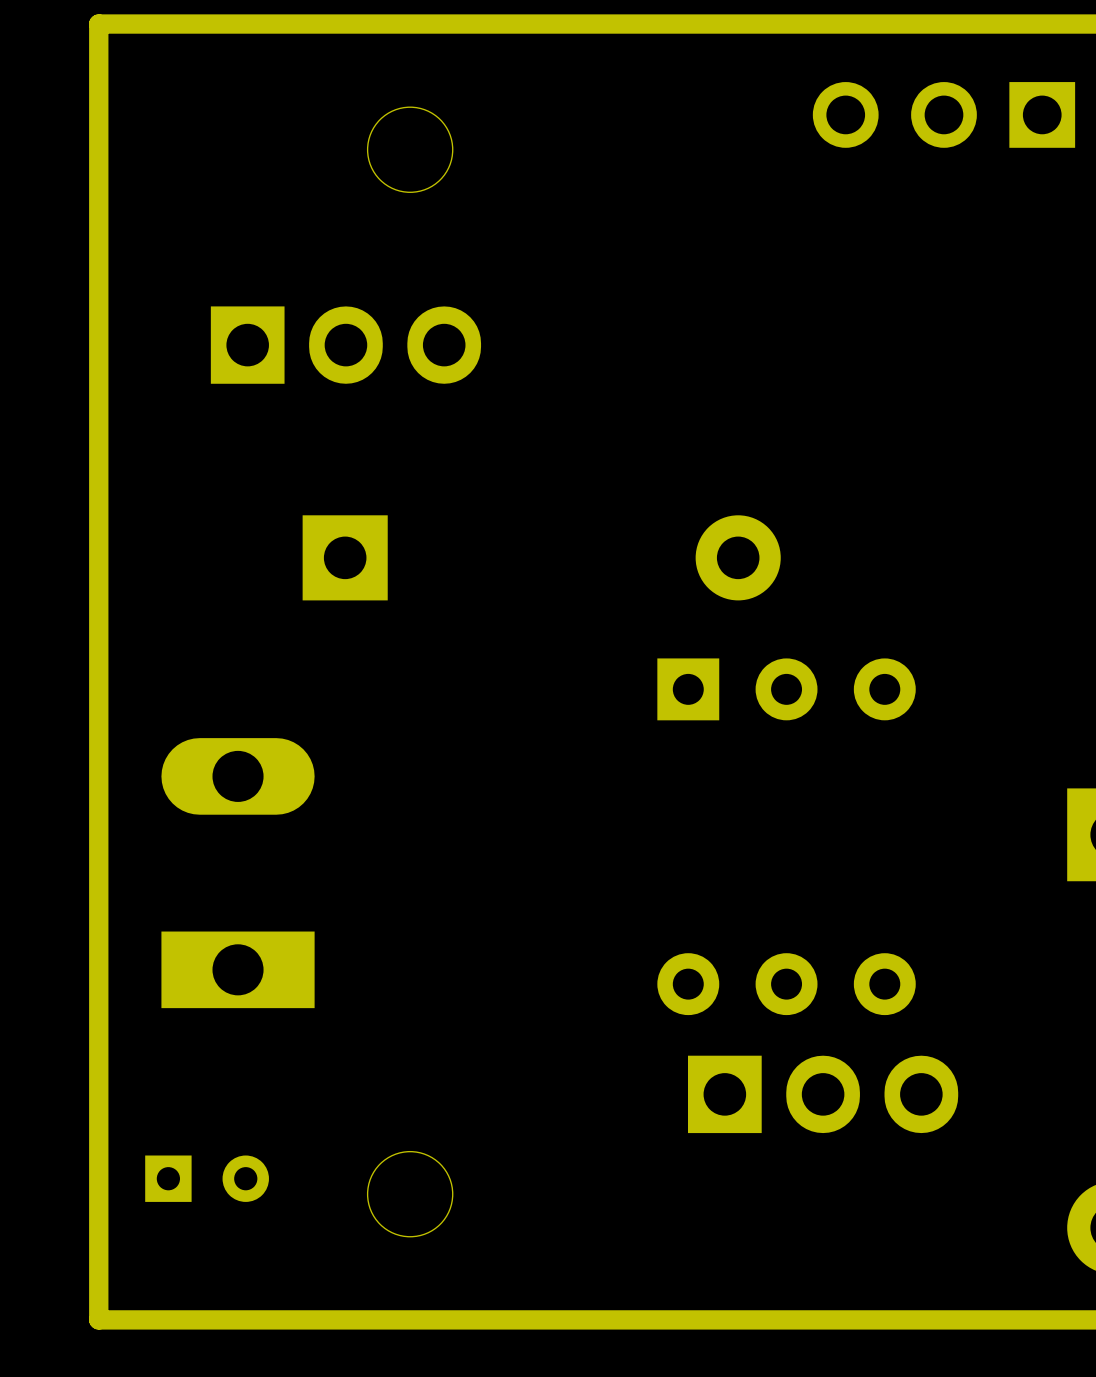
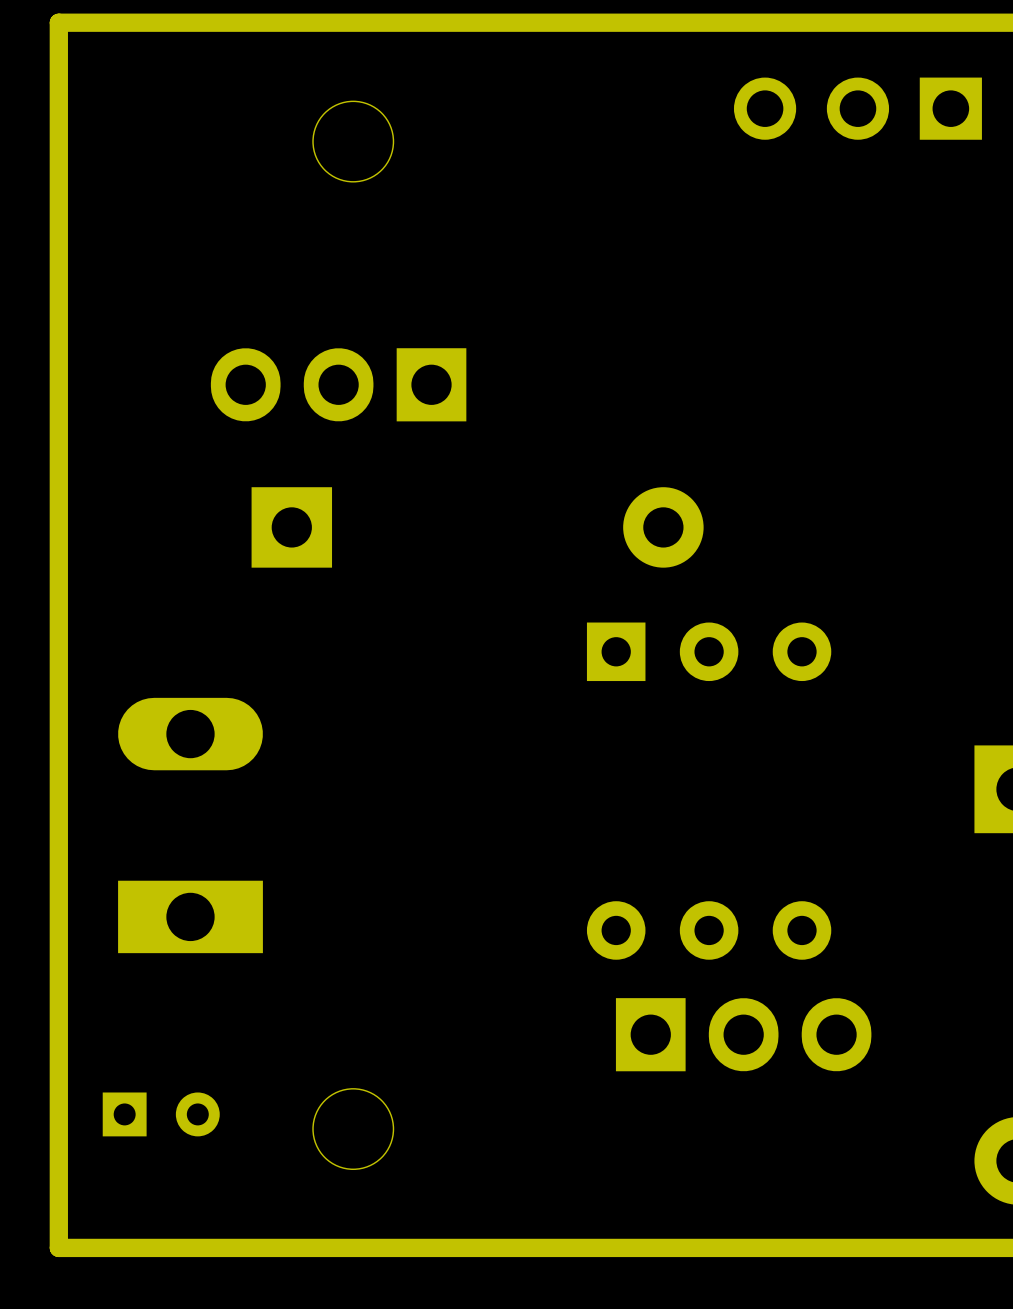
part rotation: 0° (345, 345) -> 180° (338, 384)

